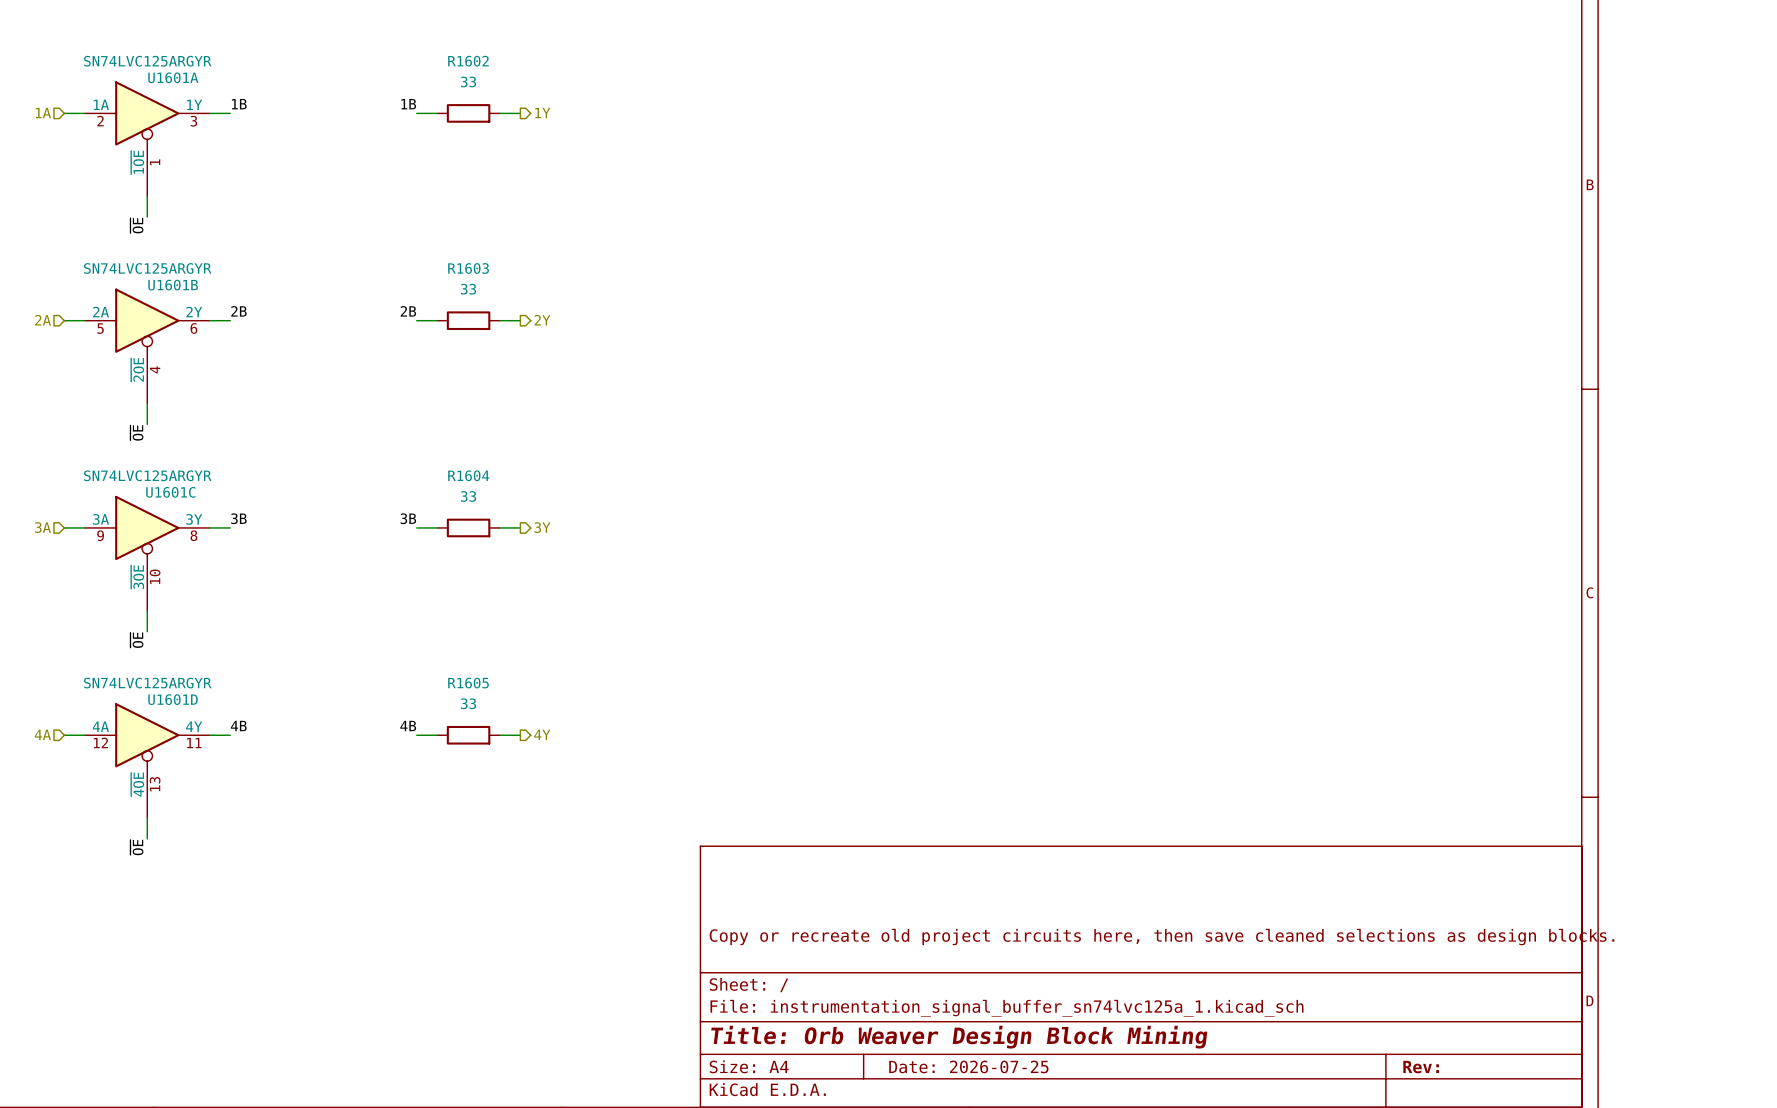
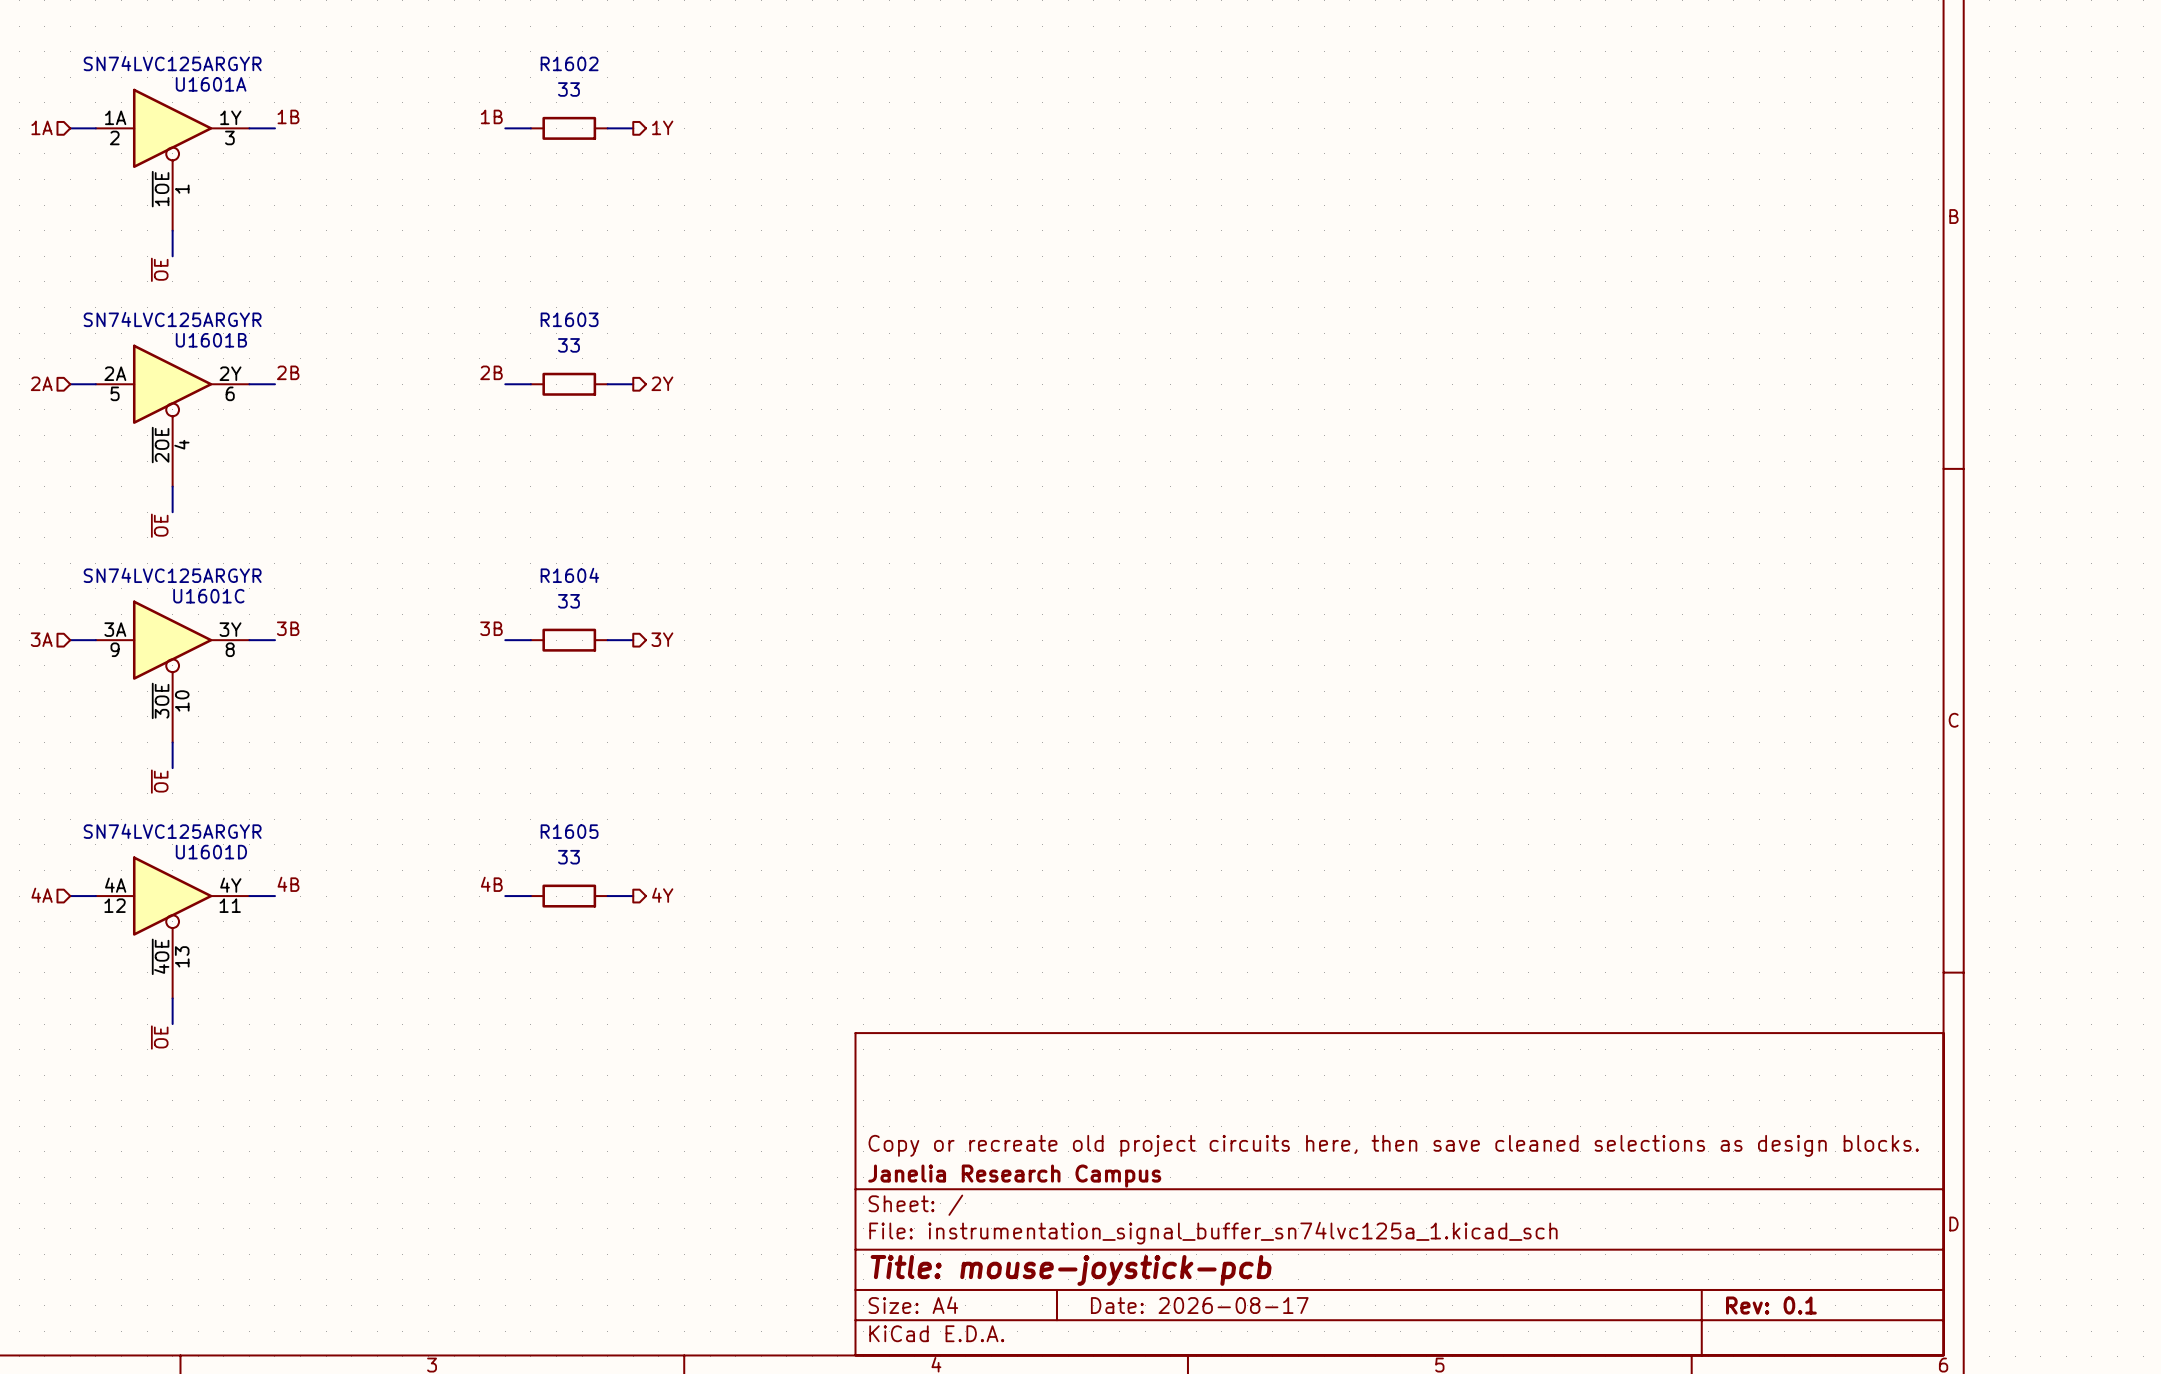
title block: none -> Janelia Research Campus (1014, 1176)
title block: Title: Orb Weaver Design Block Mining (959, 1037) -> Title: mouse-joystick-pcb (1071, 1270)
title block: Date: 2026-07-25 (968, 1066) -> Date: 2026-08-17 (1199, 1305)
title block: Rev: (1421, 1067) -> Rev: 0.1 (1771, 1305)

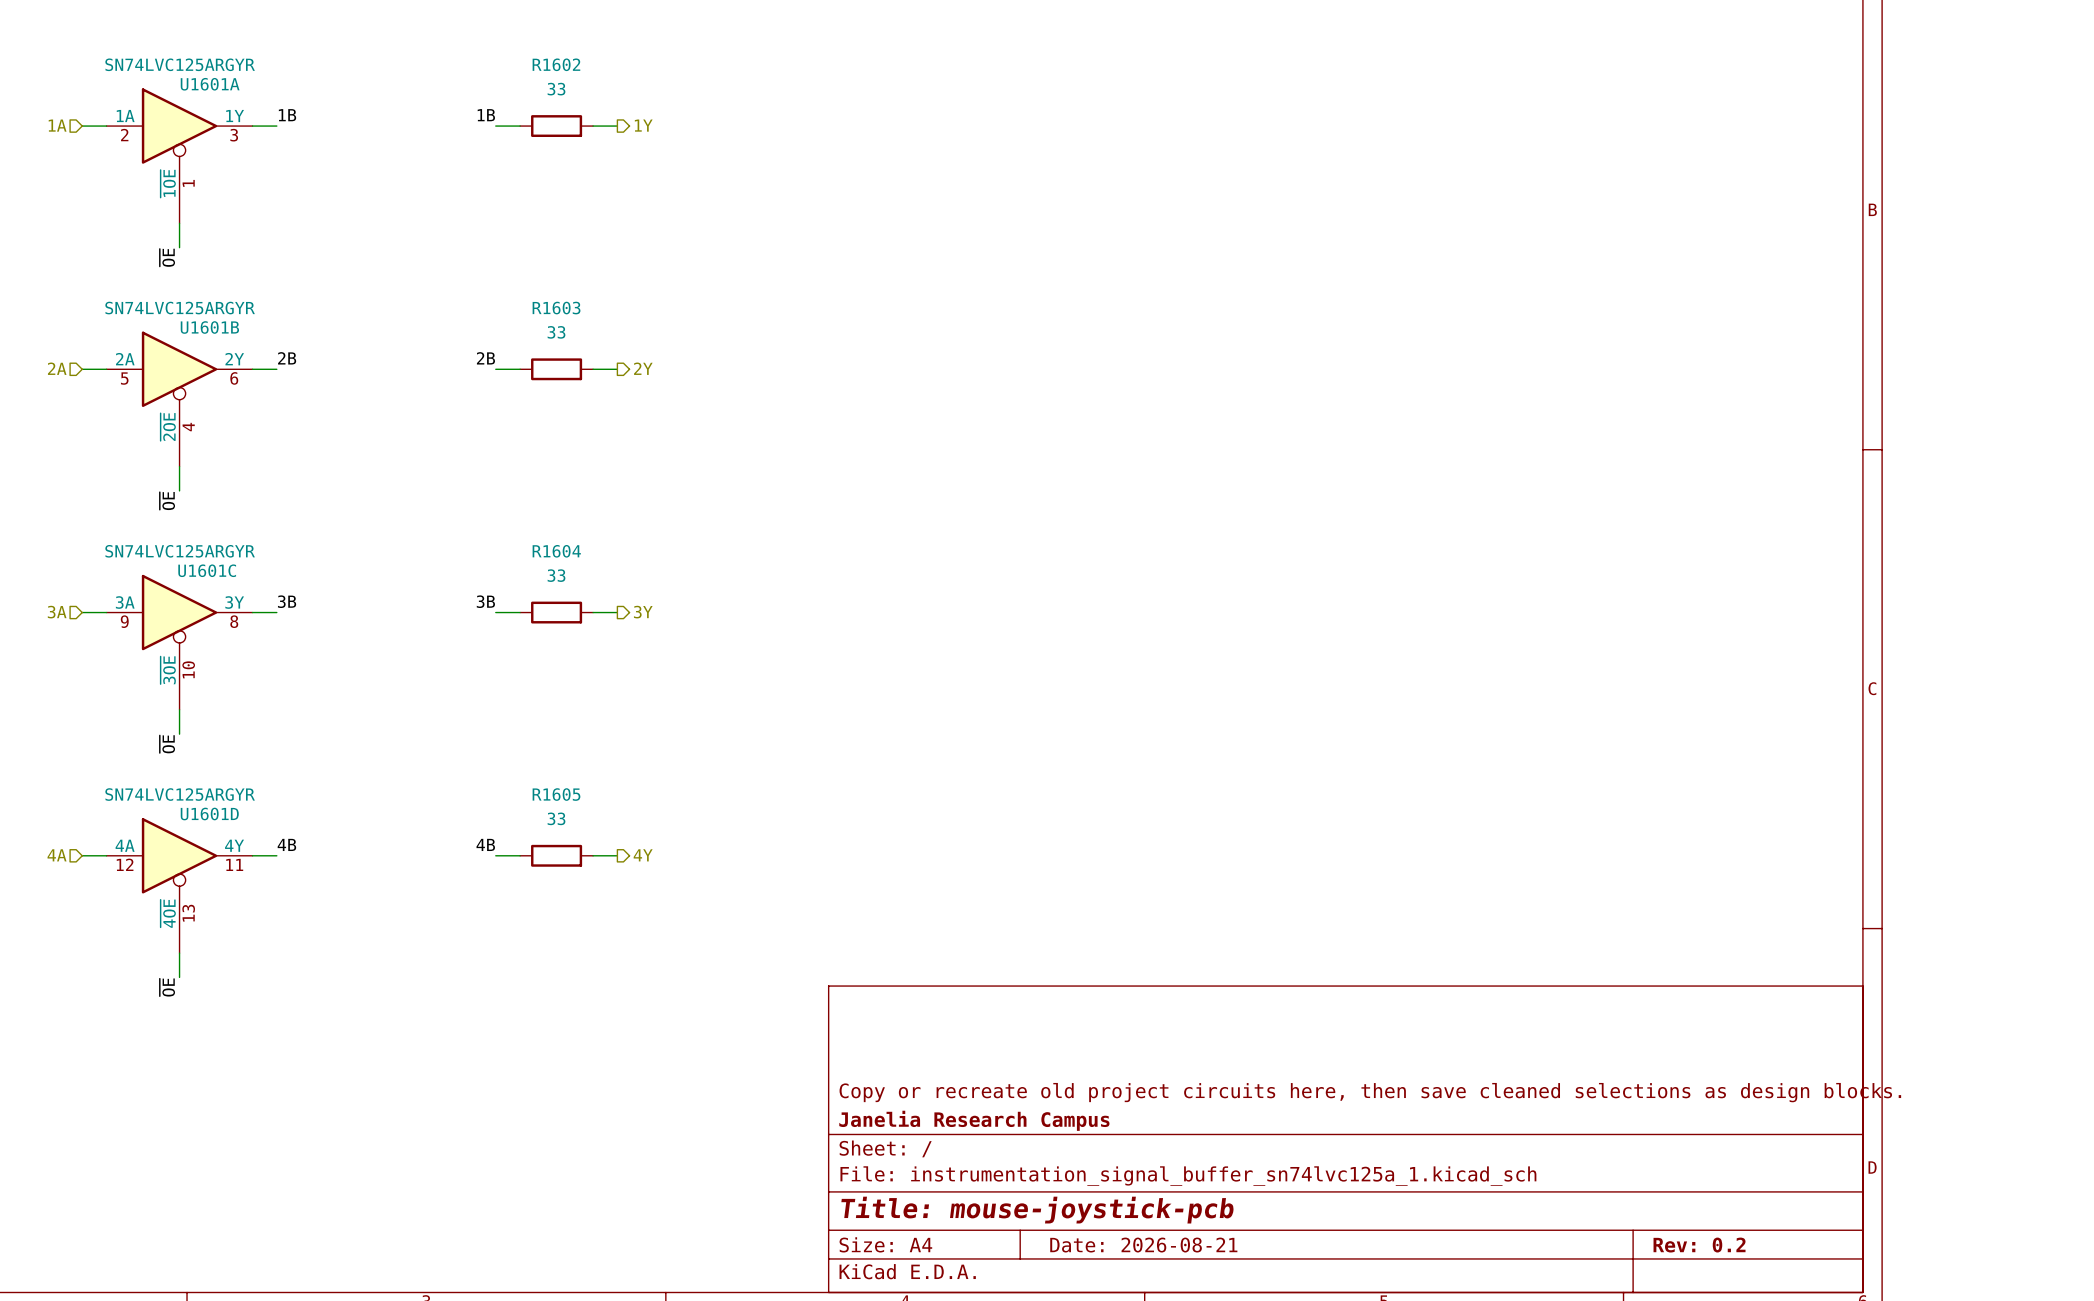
title block: Date: 2026-08-17 (1199, 1305) -> Date: 2026-08-21 (1143, 1245)
title block: Rev: 0.1 (1771, 1305) -> Rev: 0.2 (1699, 1245)

